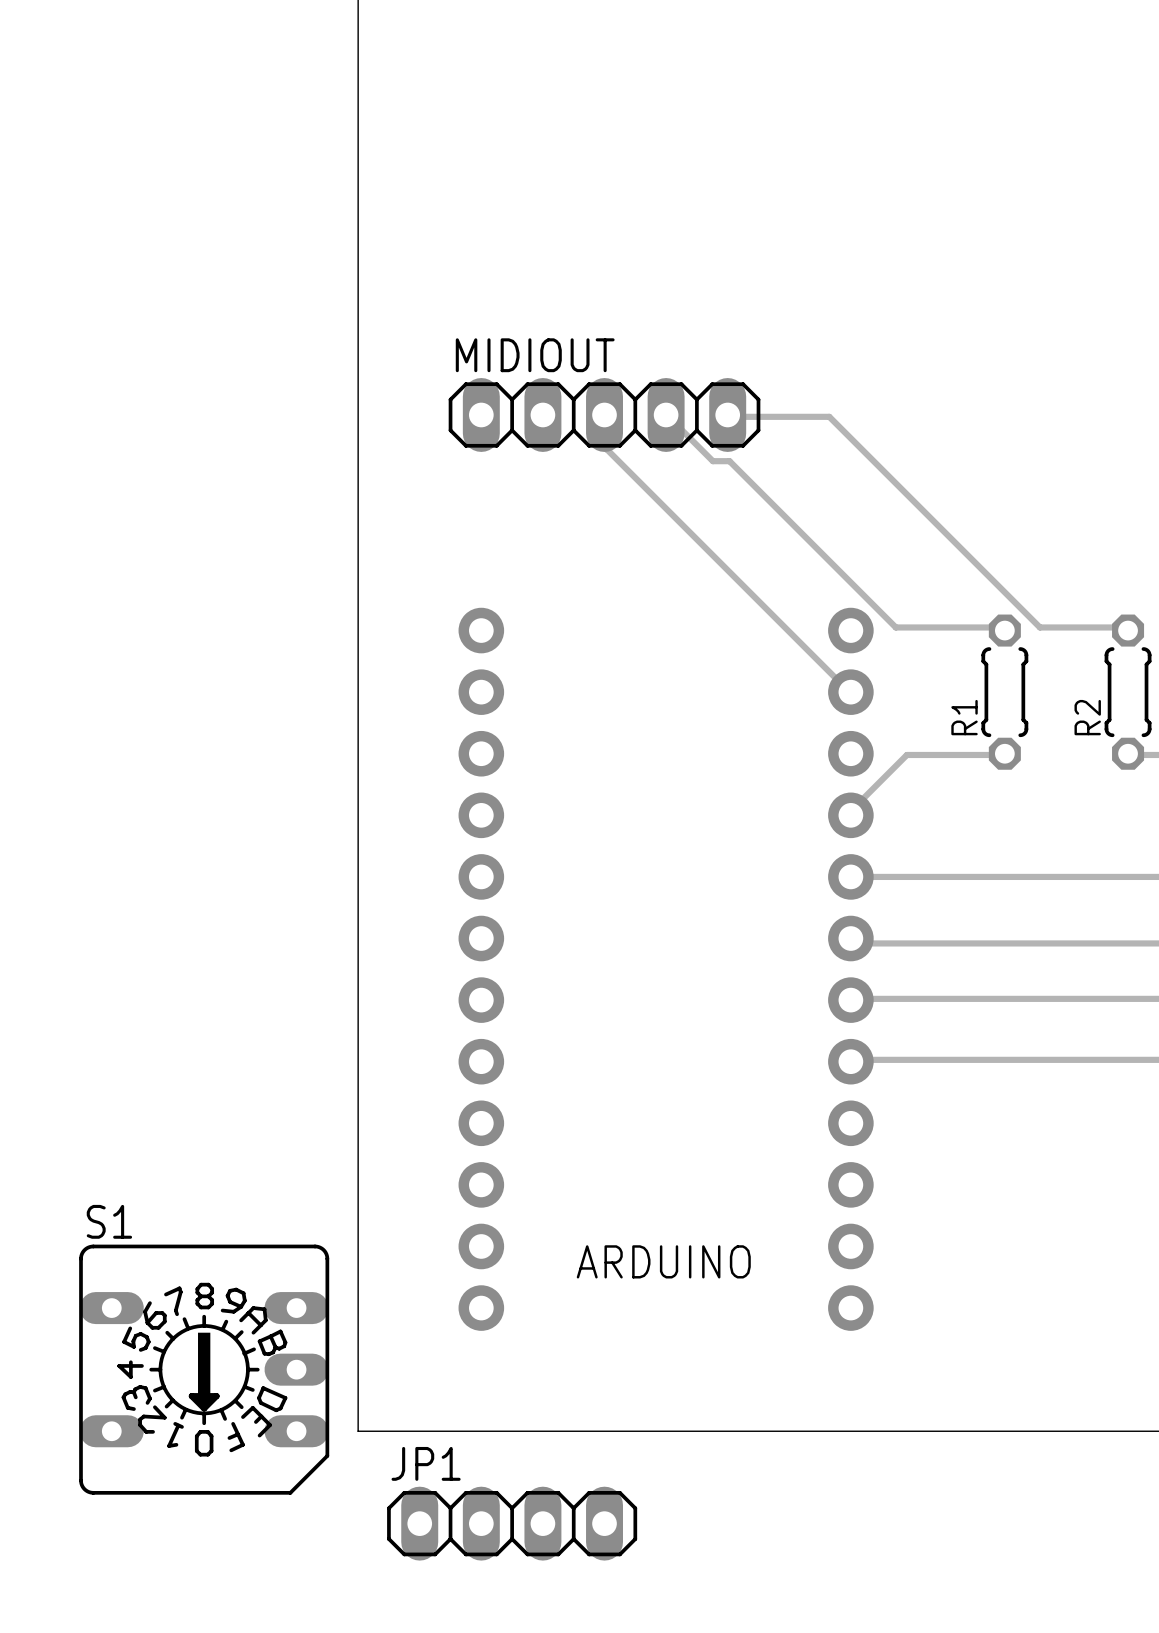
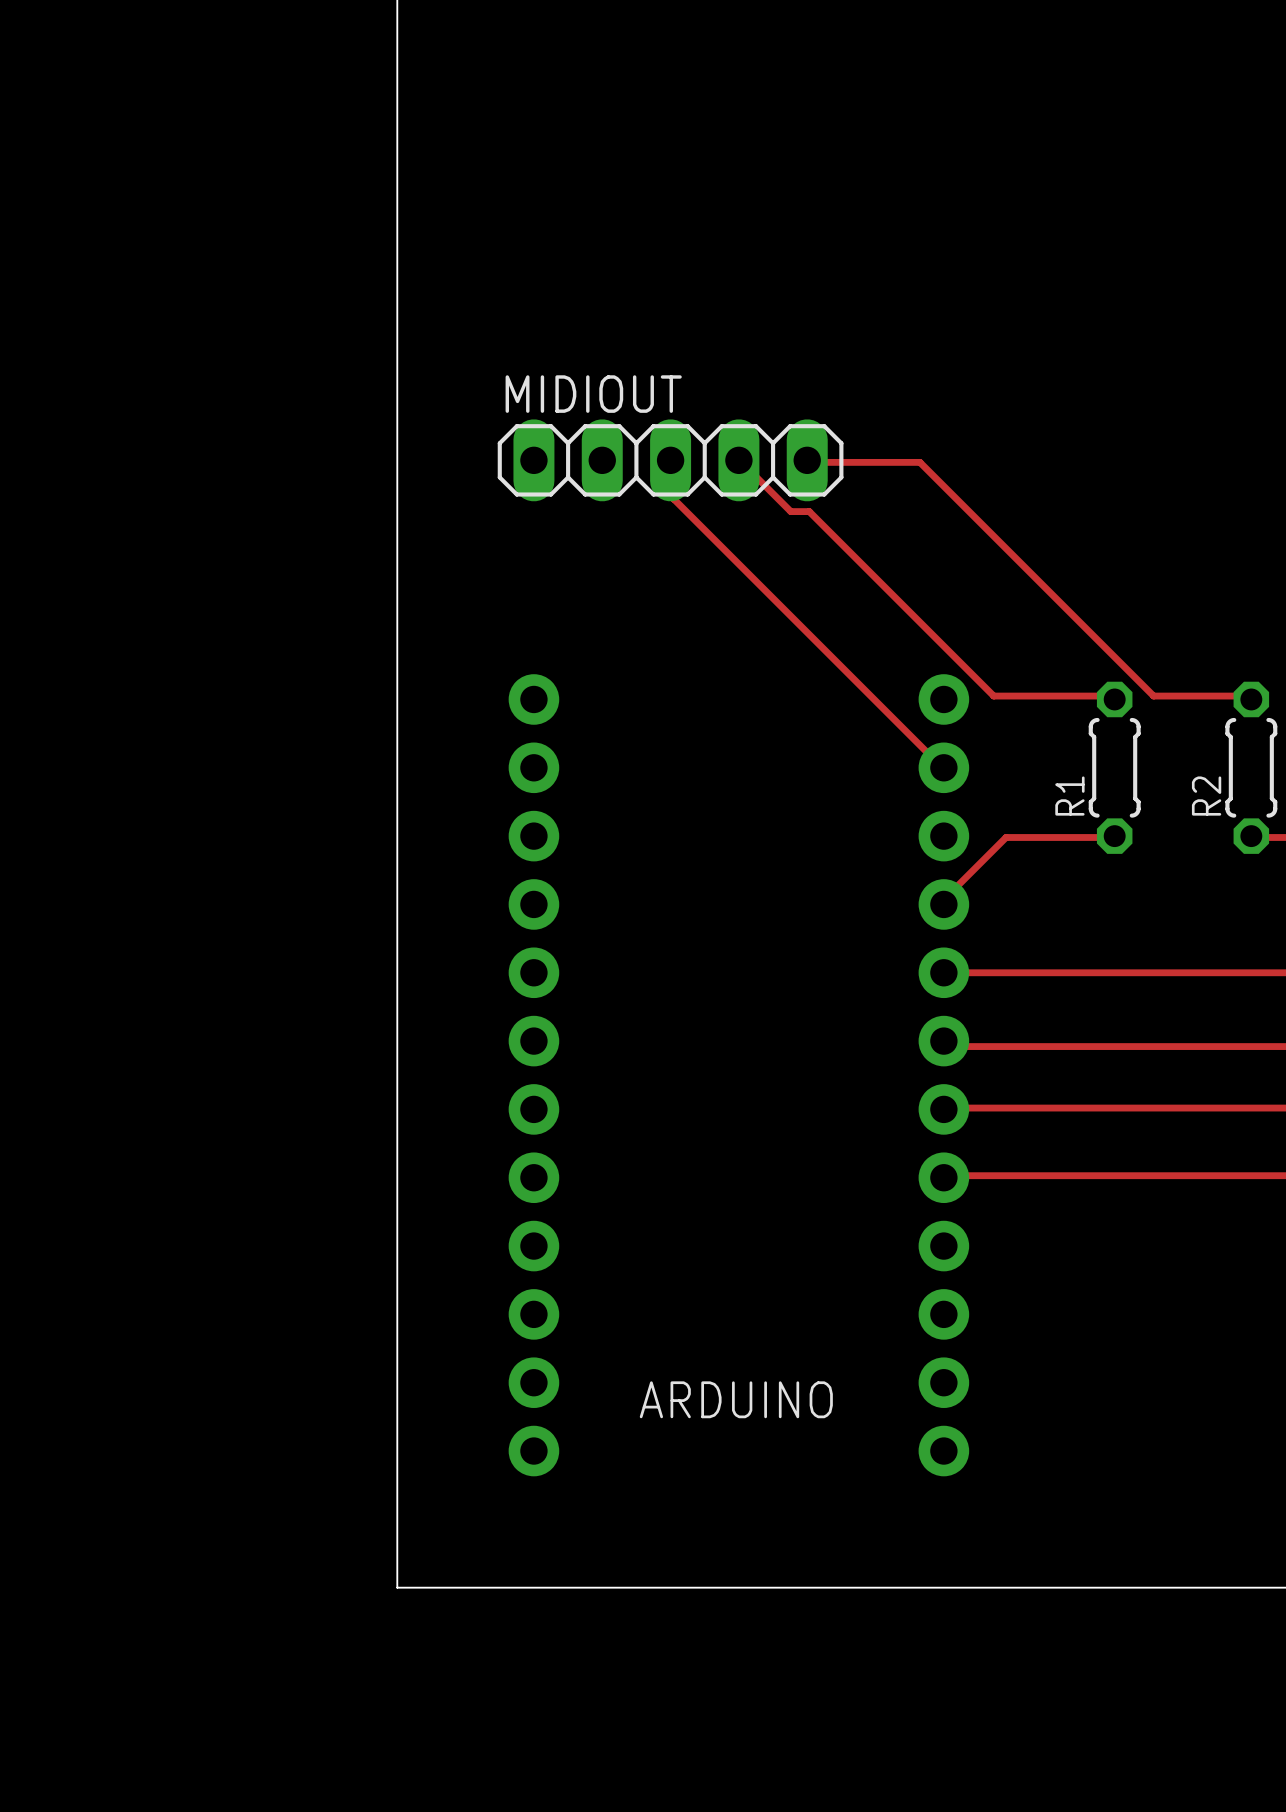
S1: (204, 1369) -> none
JP1: (512, 1523) -> none

